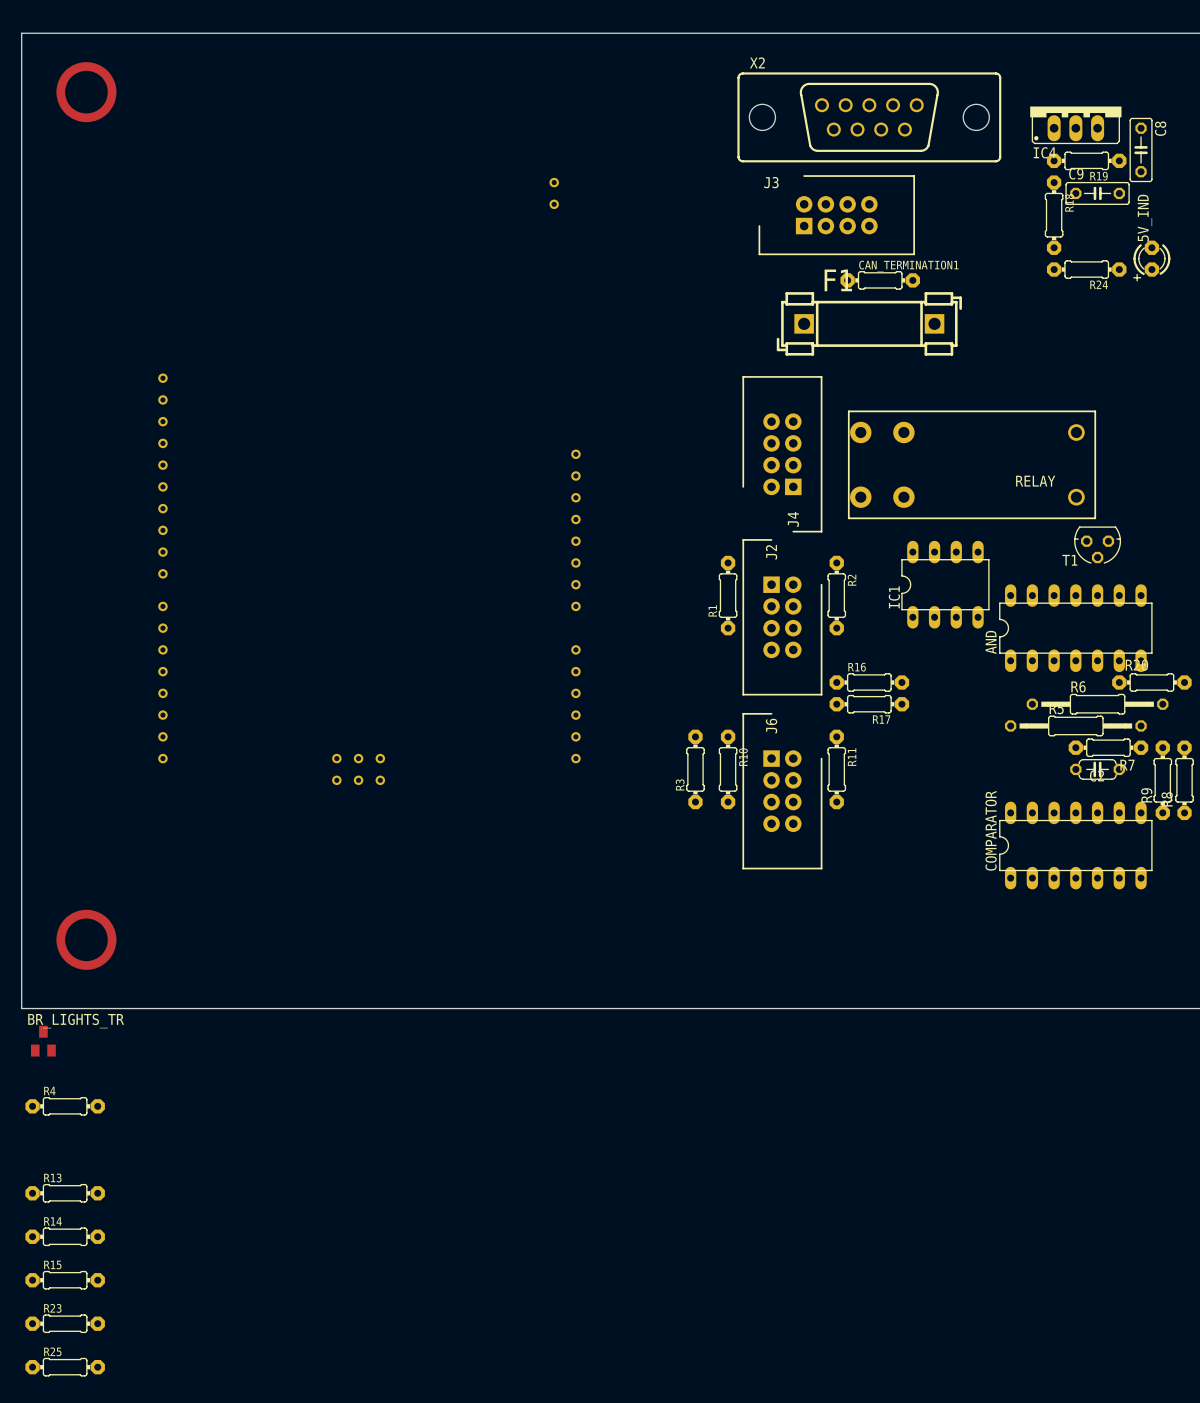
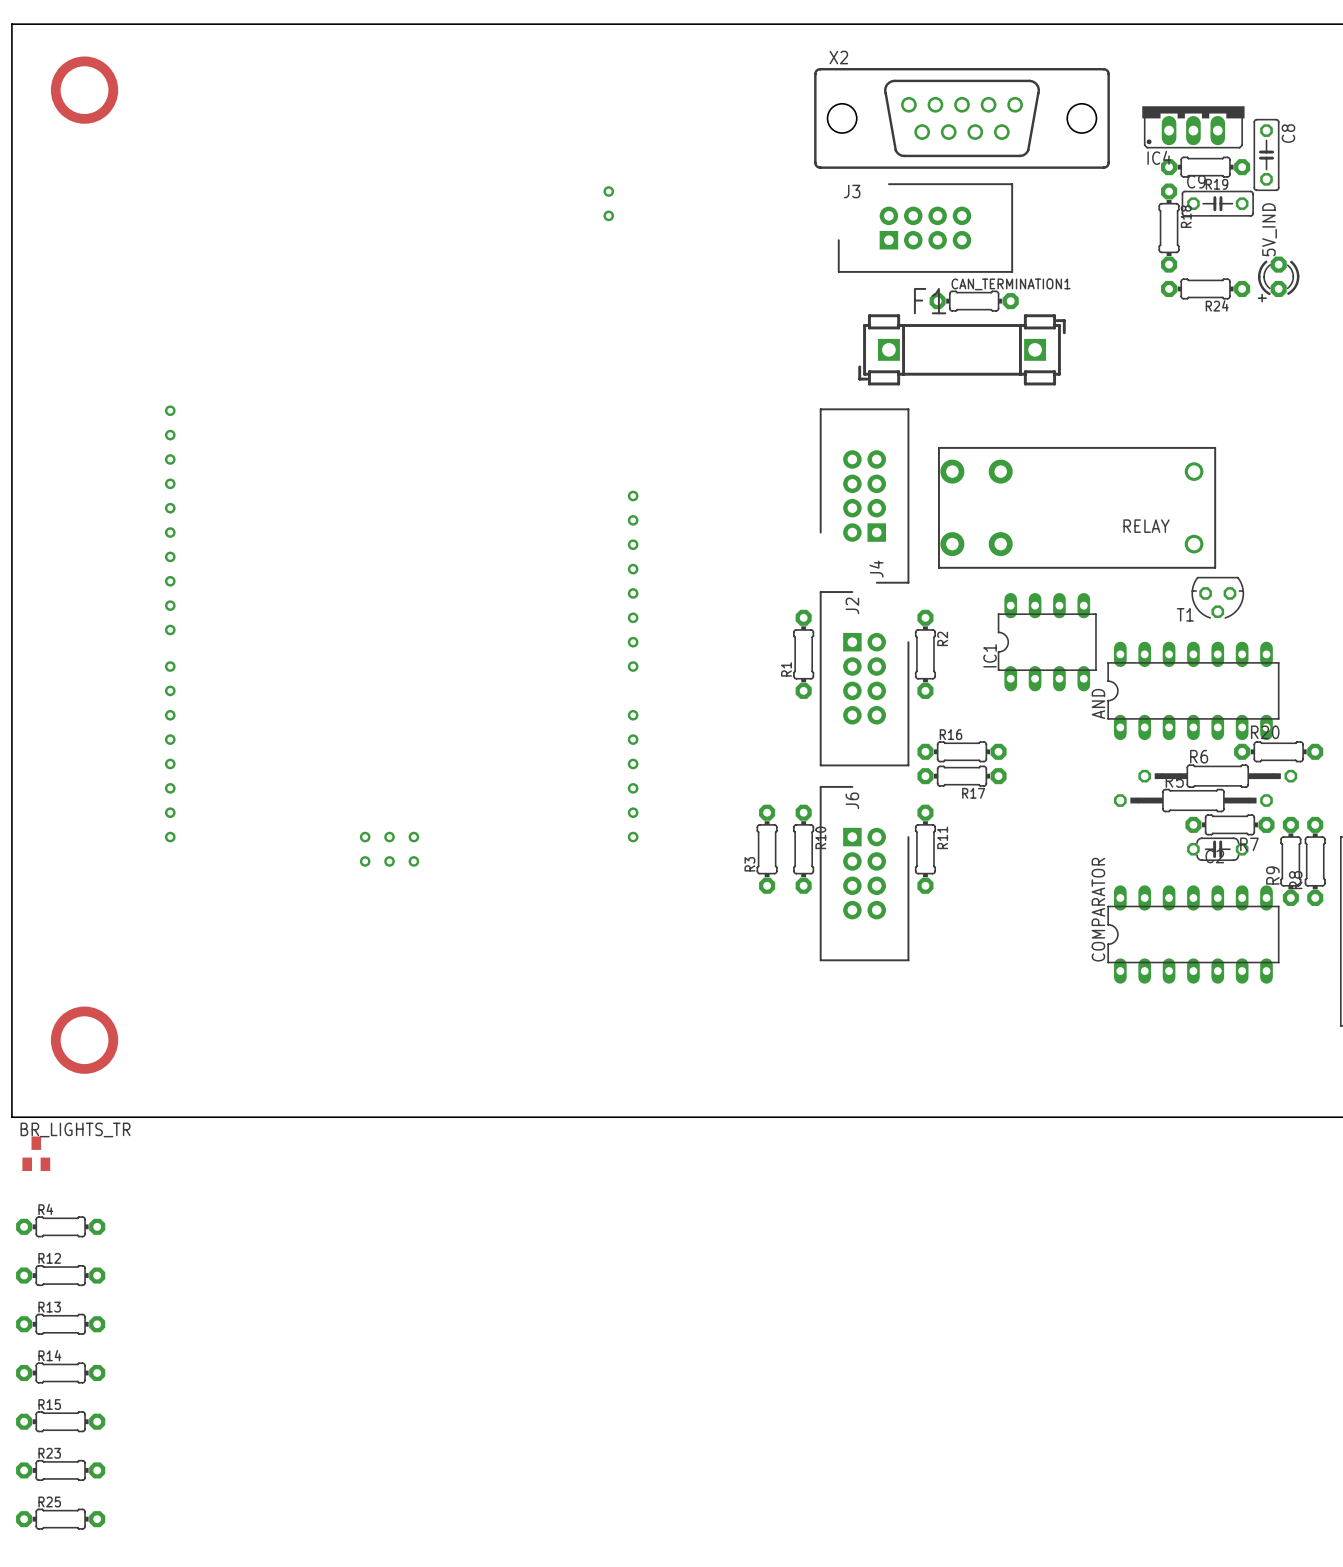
R12: none -> (60, 1275)

